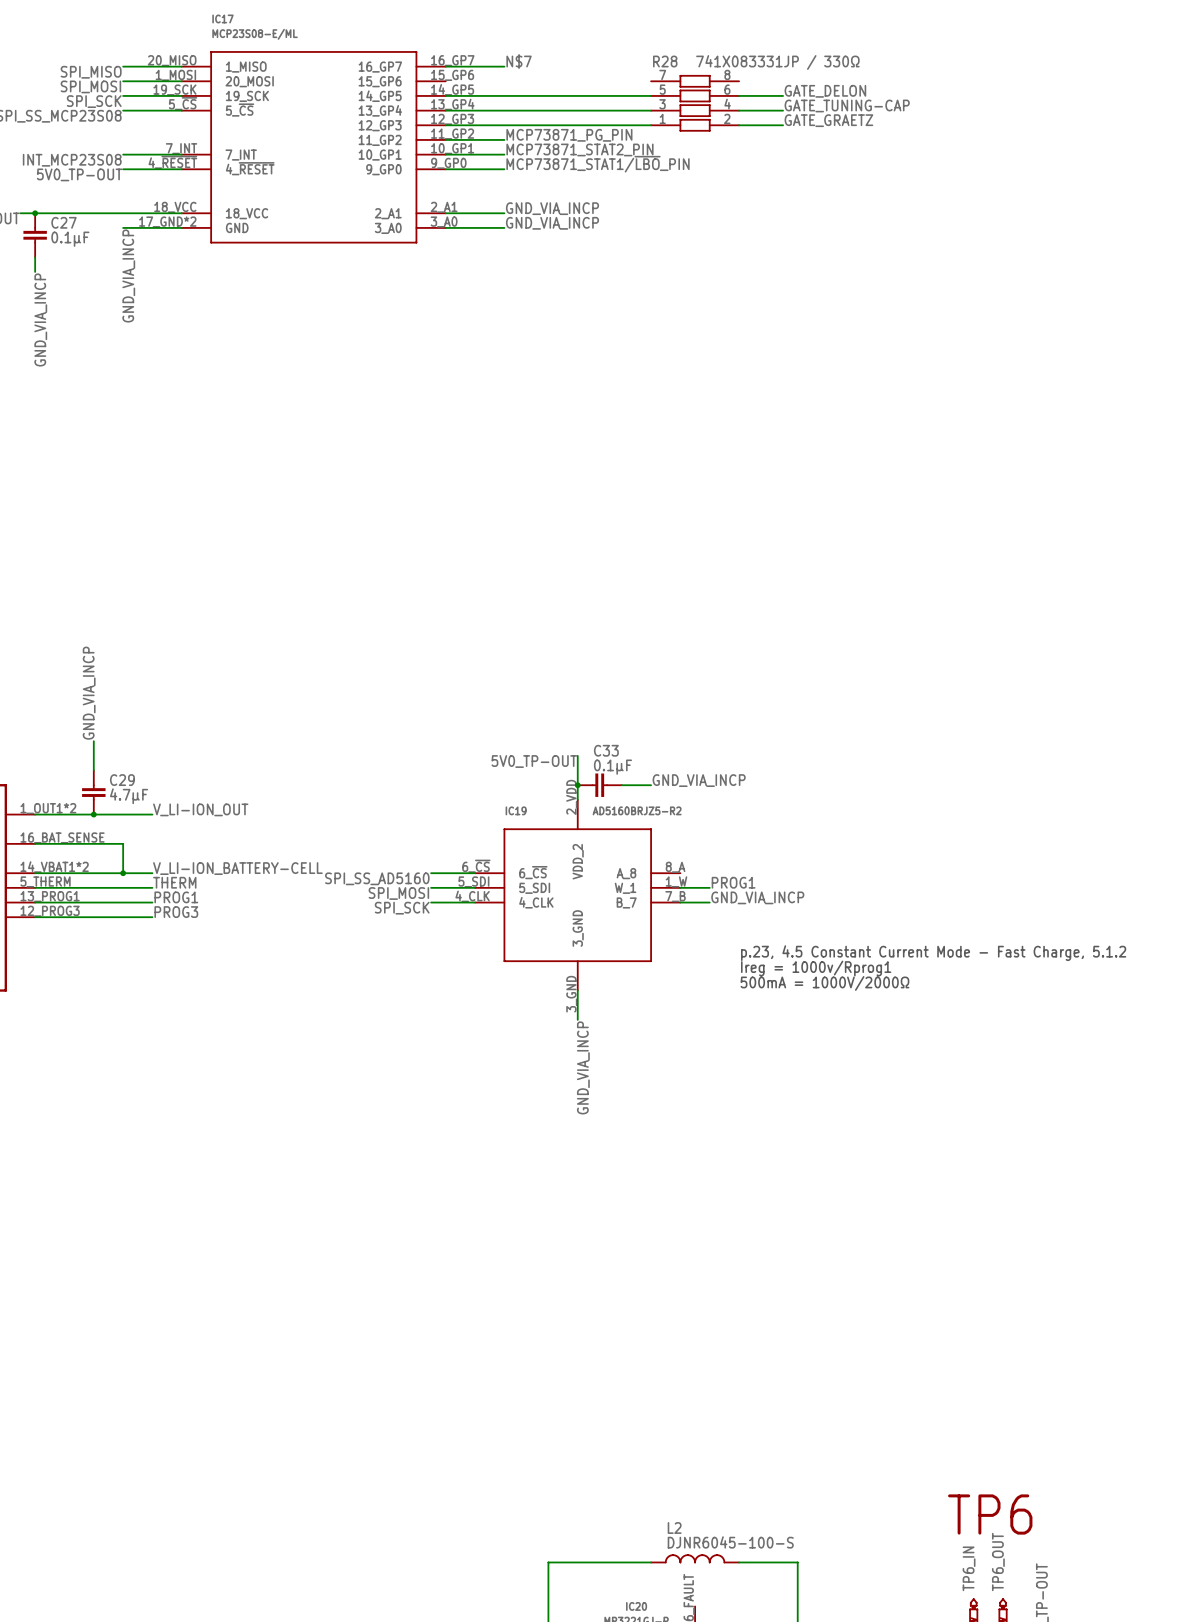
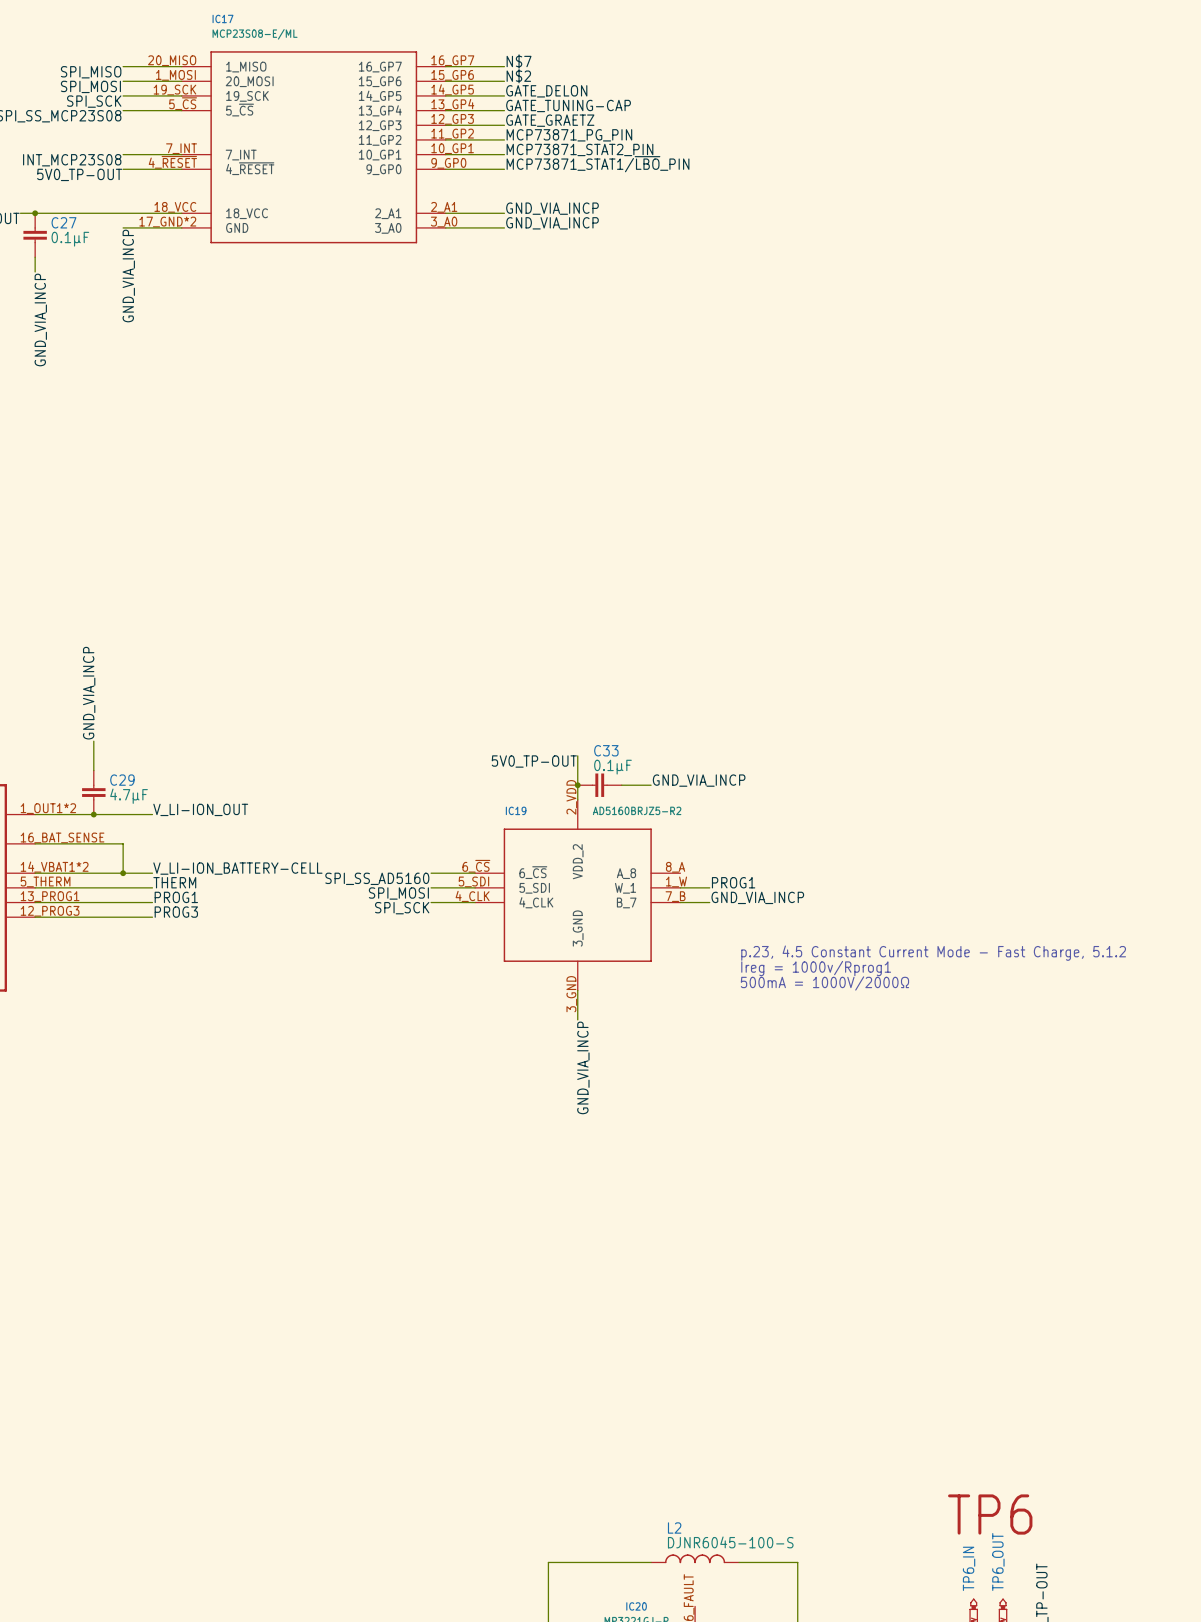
label: none -> N$2 (518, 76)
wire: none -> (445, 81) (504, 81)
label: none -> GATE_DELON (546, 91)
label: GATE_DELON (825, 91) -> none
wire: (504, 95) (651, 95) -> none
wire: (739, 95) (783, 95) -> none
R28: 741X083331JP / 330Ω (695, 103) -> none
label: none -> GATE_TUNING-CAP (568, 105)
label: GATE_TUNING-CAP (847, 105) -> none
wire: (504, 110) (651, 110) -> none
wire: (739, 110) (783, 110) -> none
label: none -> GATE_GRAETZ (550, 120)
label: GATE_GRAETZ (828, 120) -> none
wire: (504, 125) (651, 125) -> none
wire: (739, 125) (783, 125) -> none

